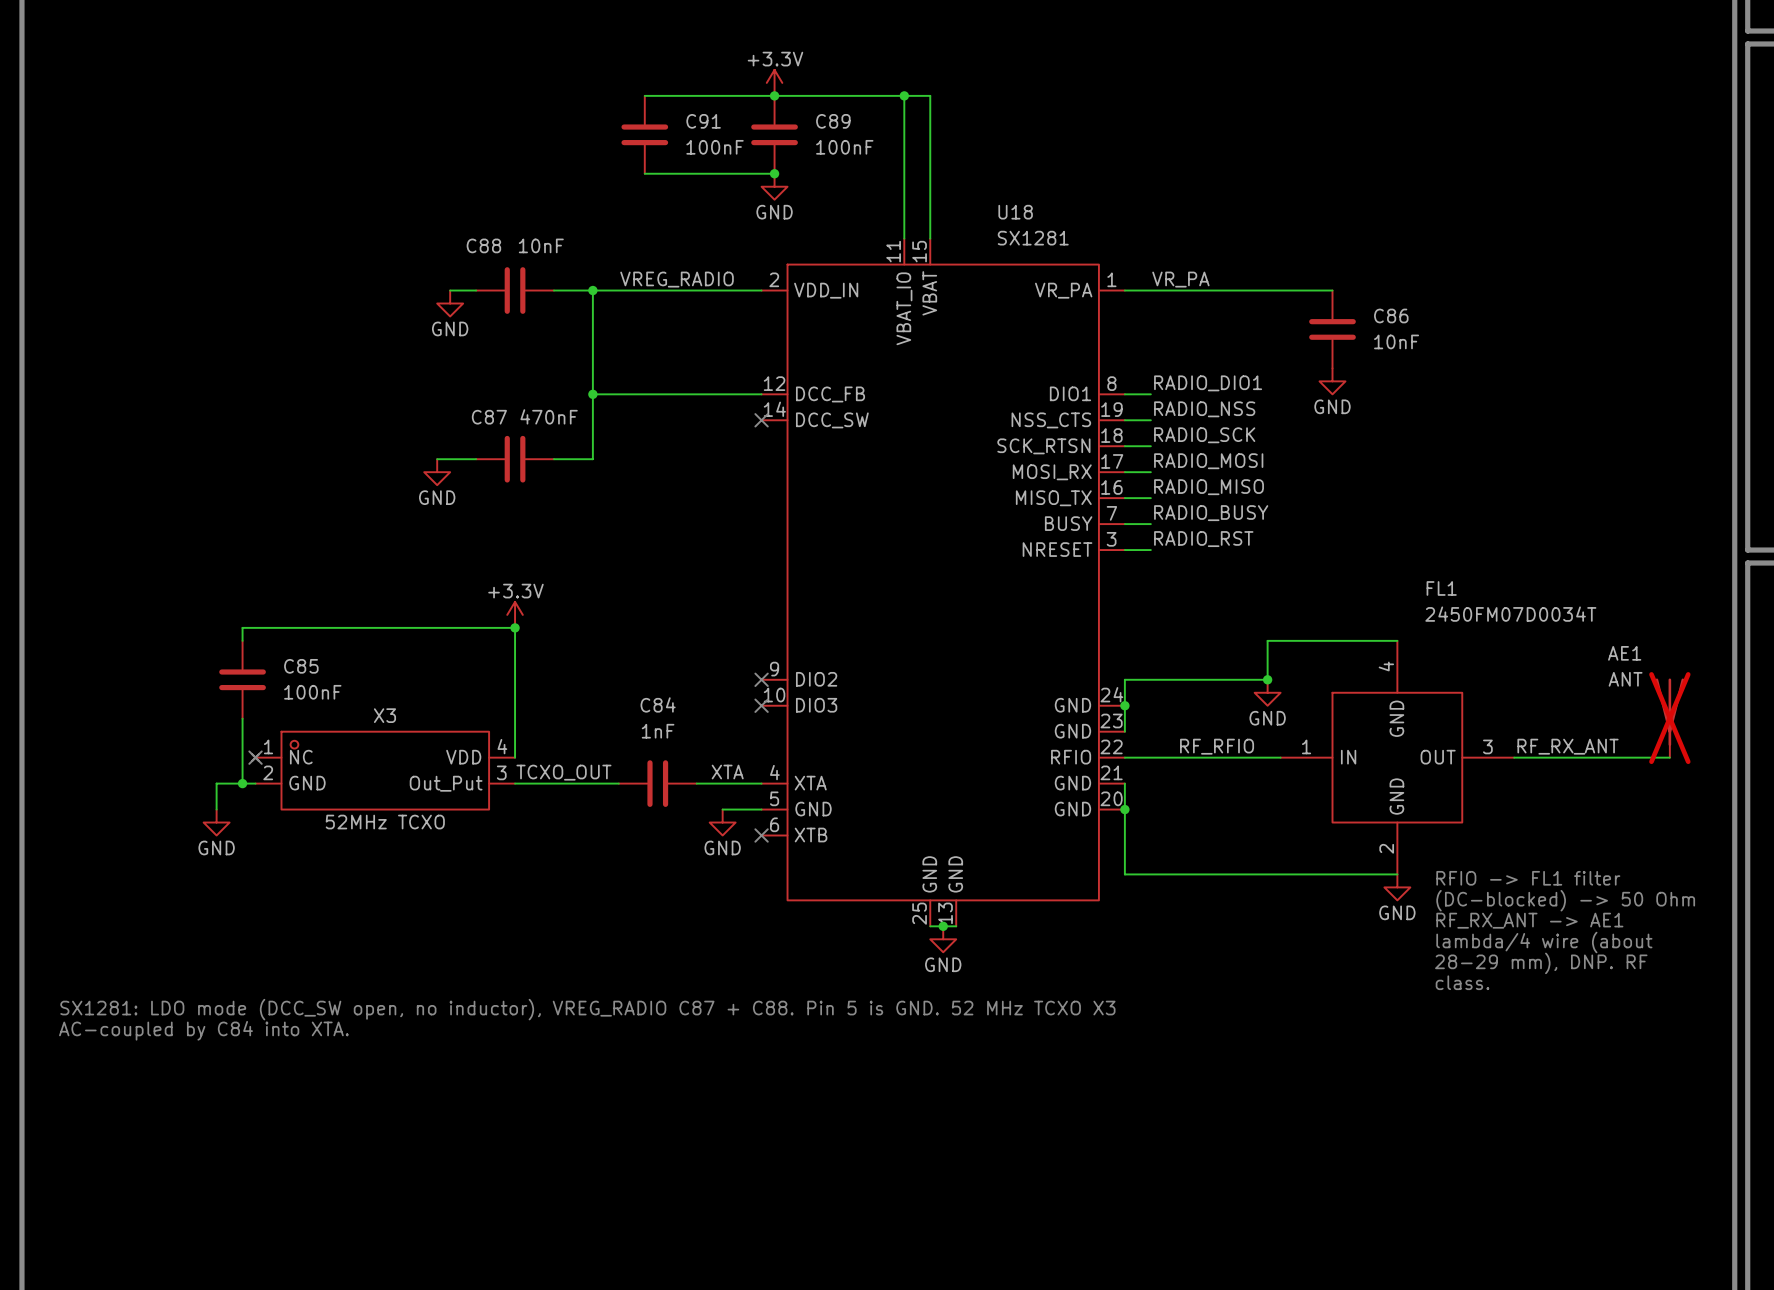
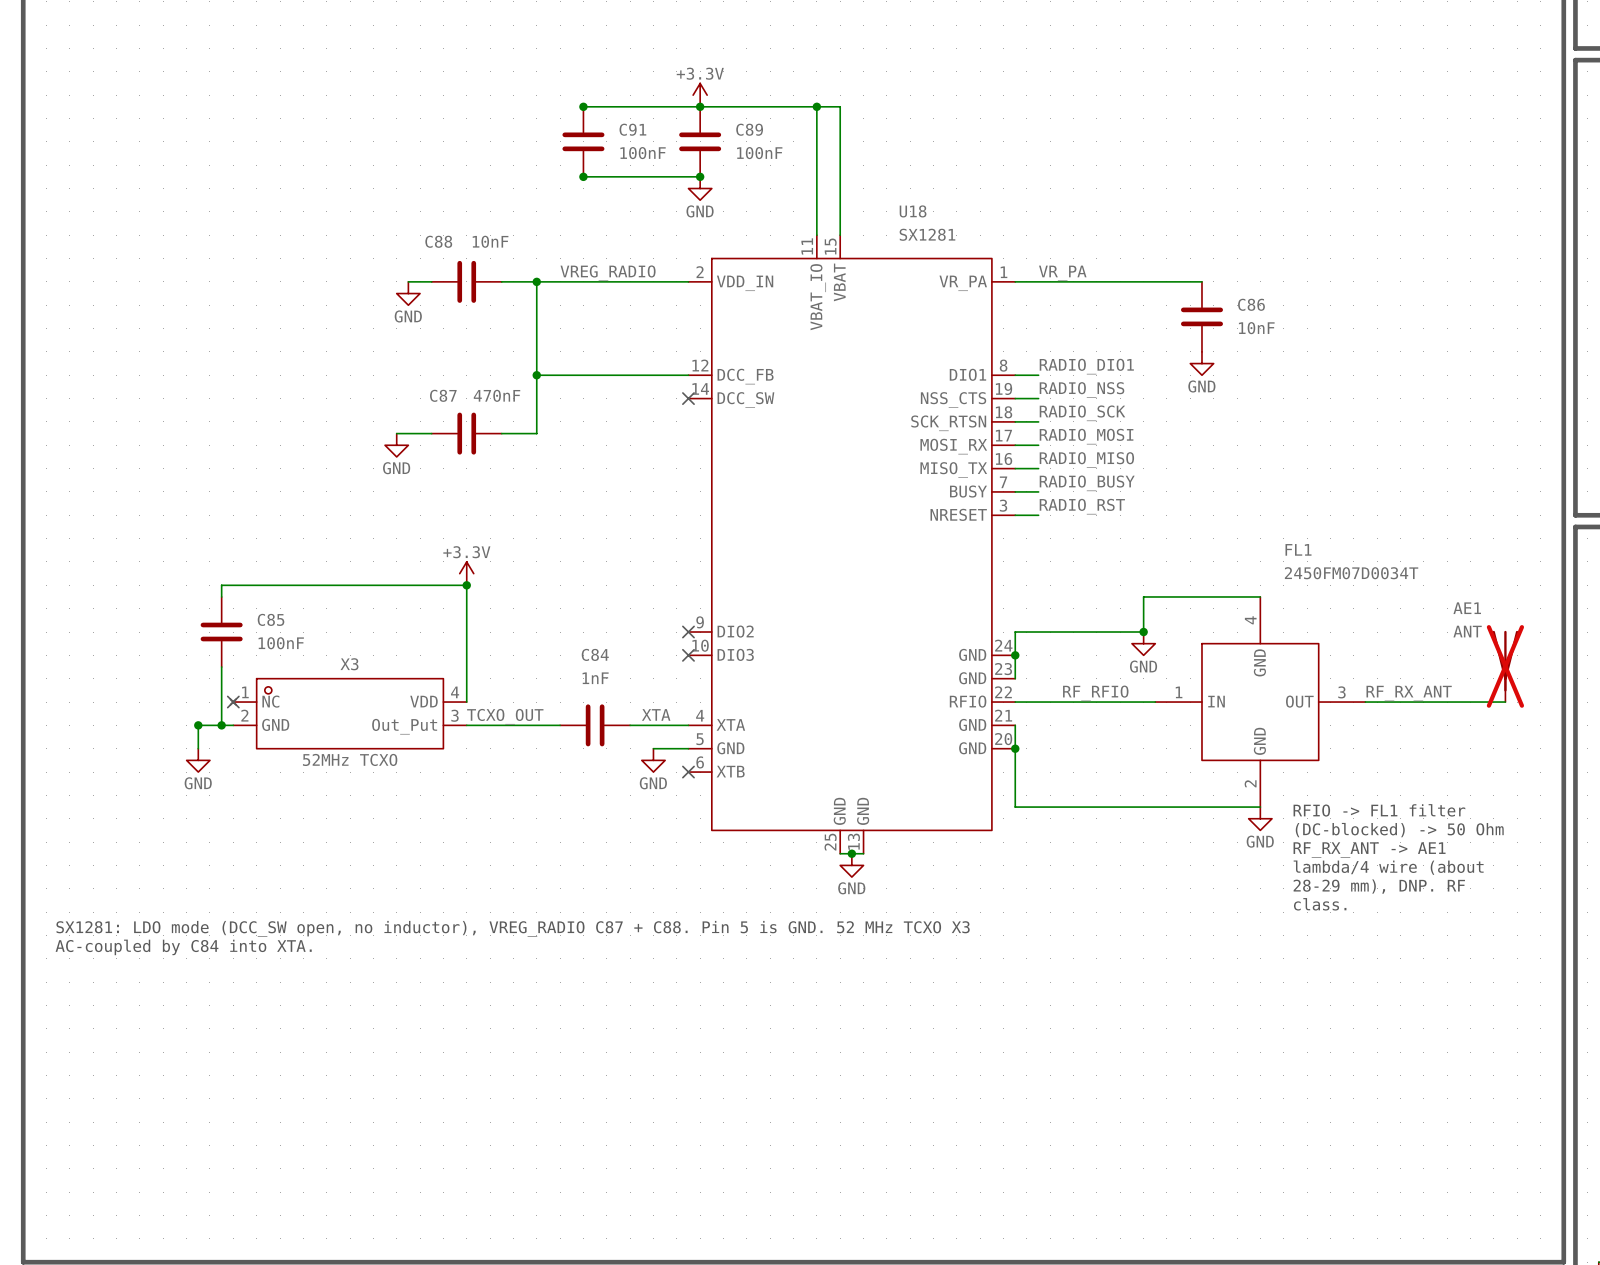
junction: none -> (583, 106)
junction: none -> (583, 176)
junction: none -> (198, 725)

